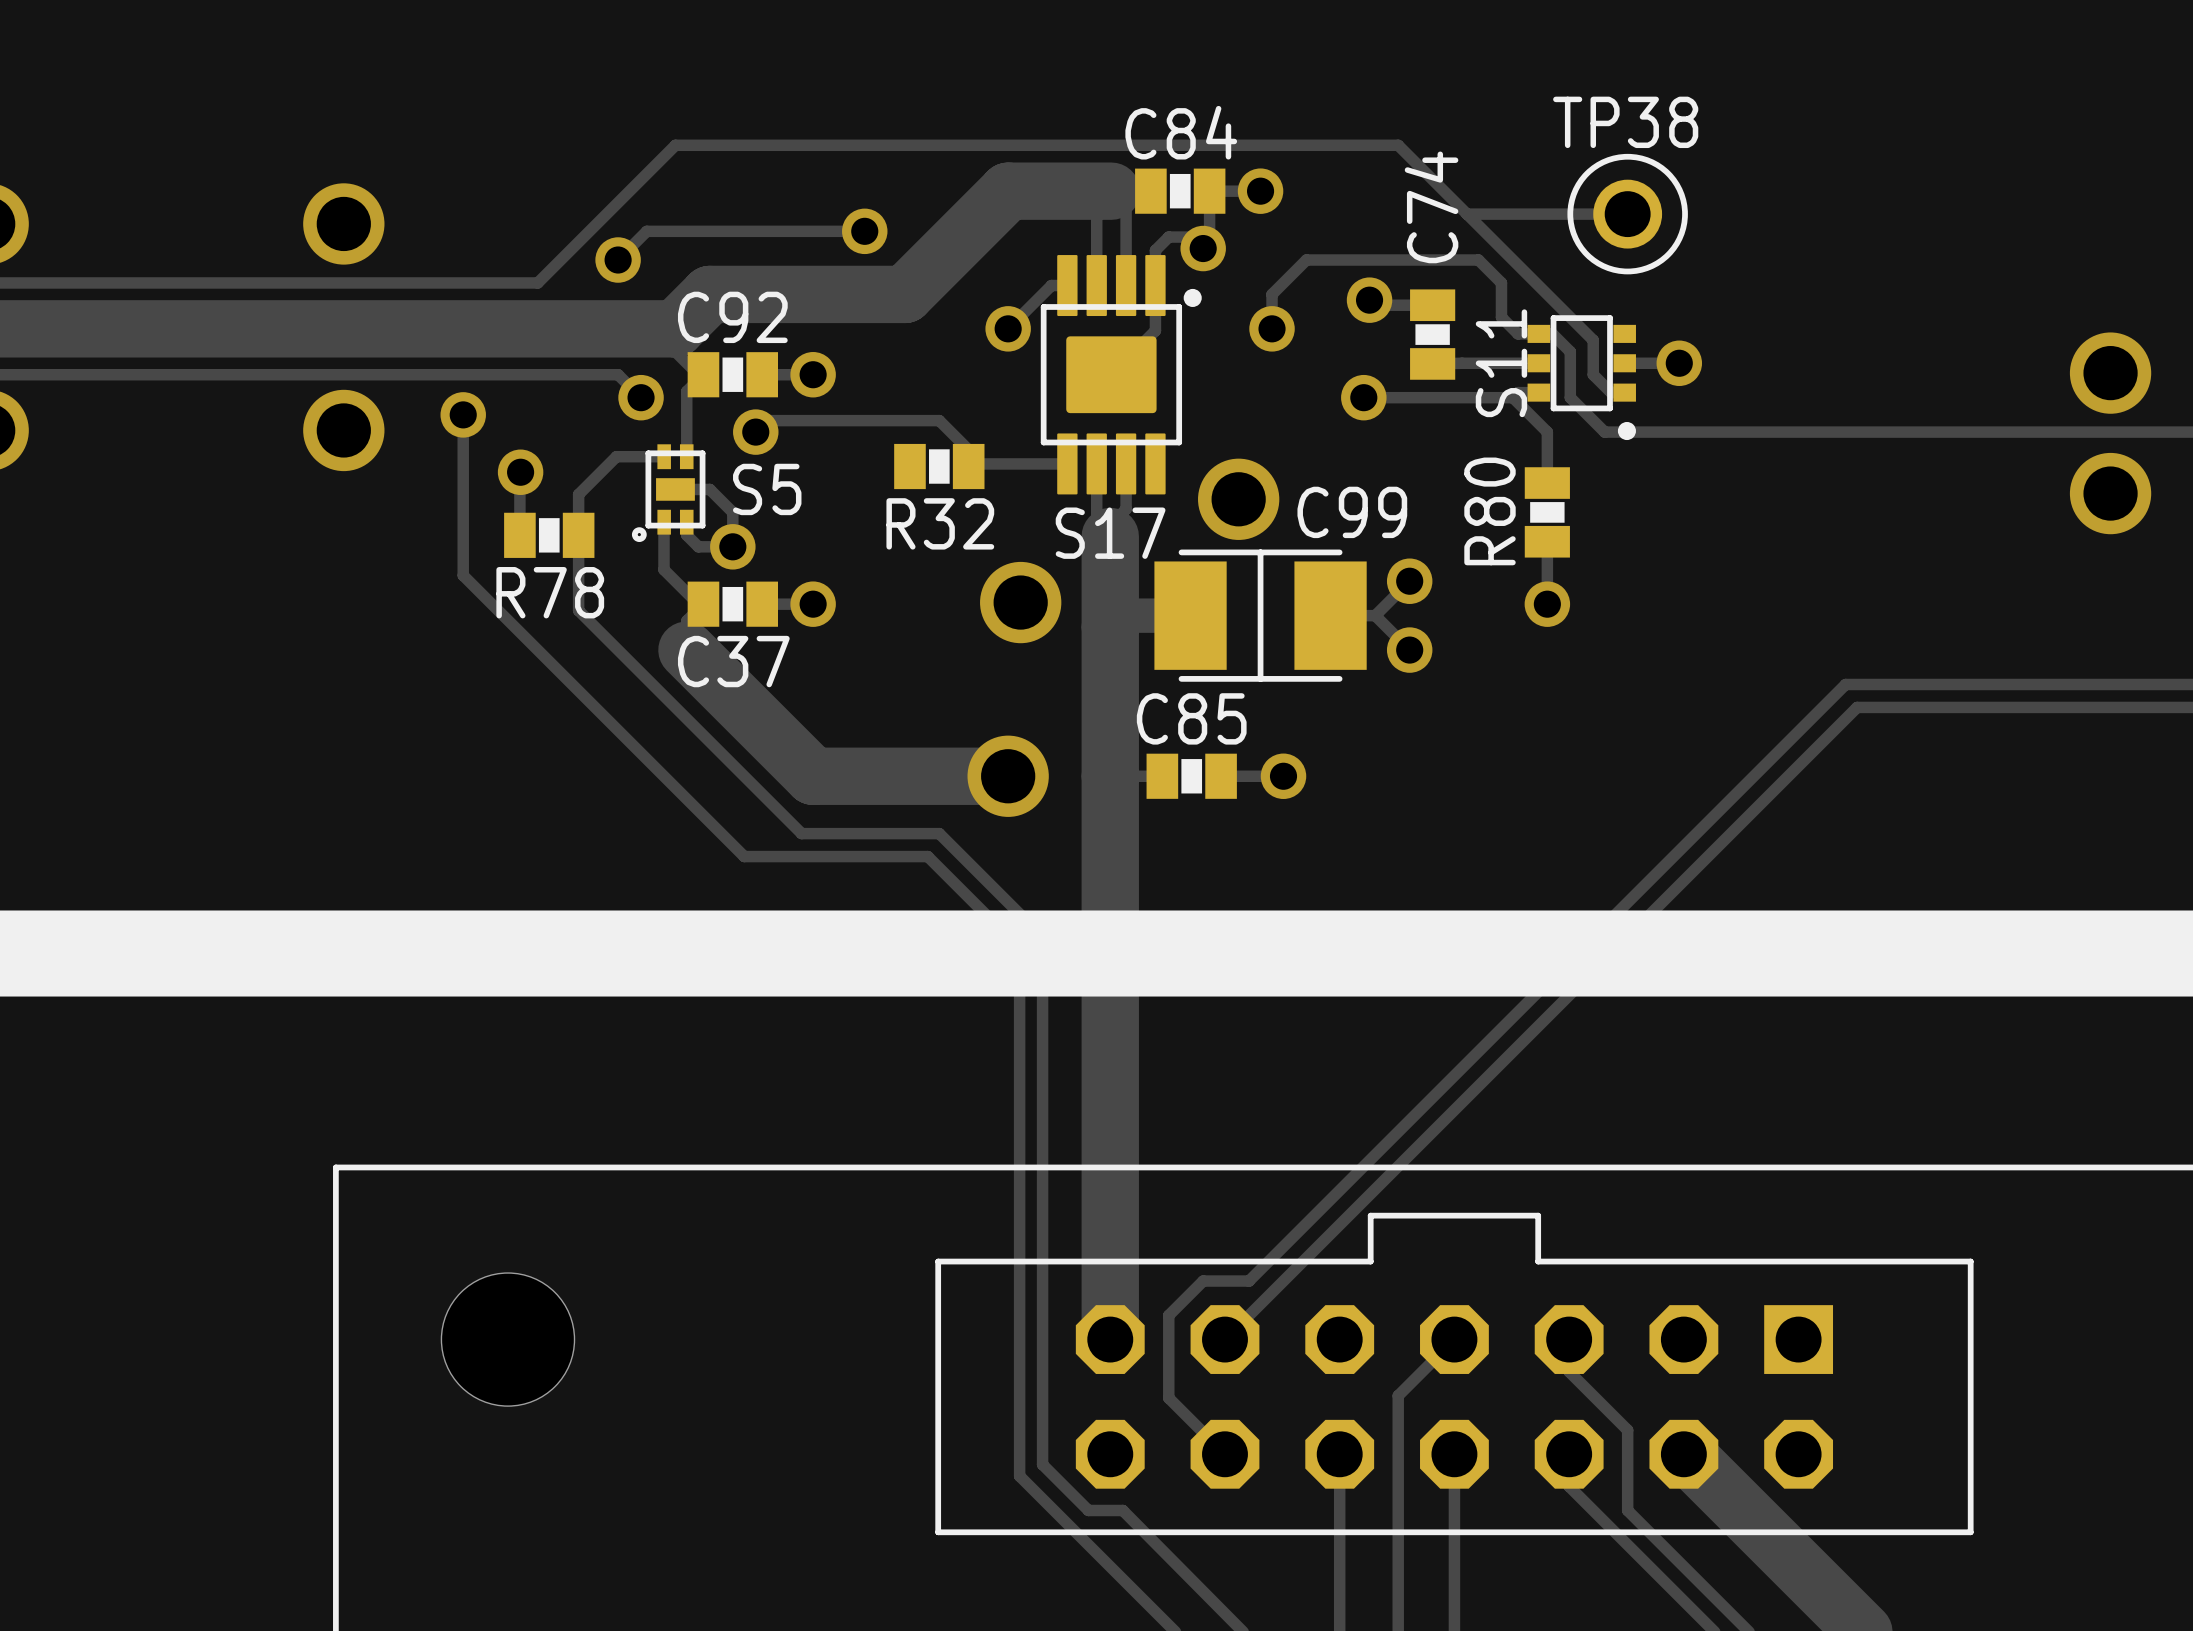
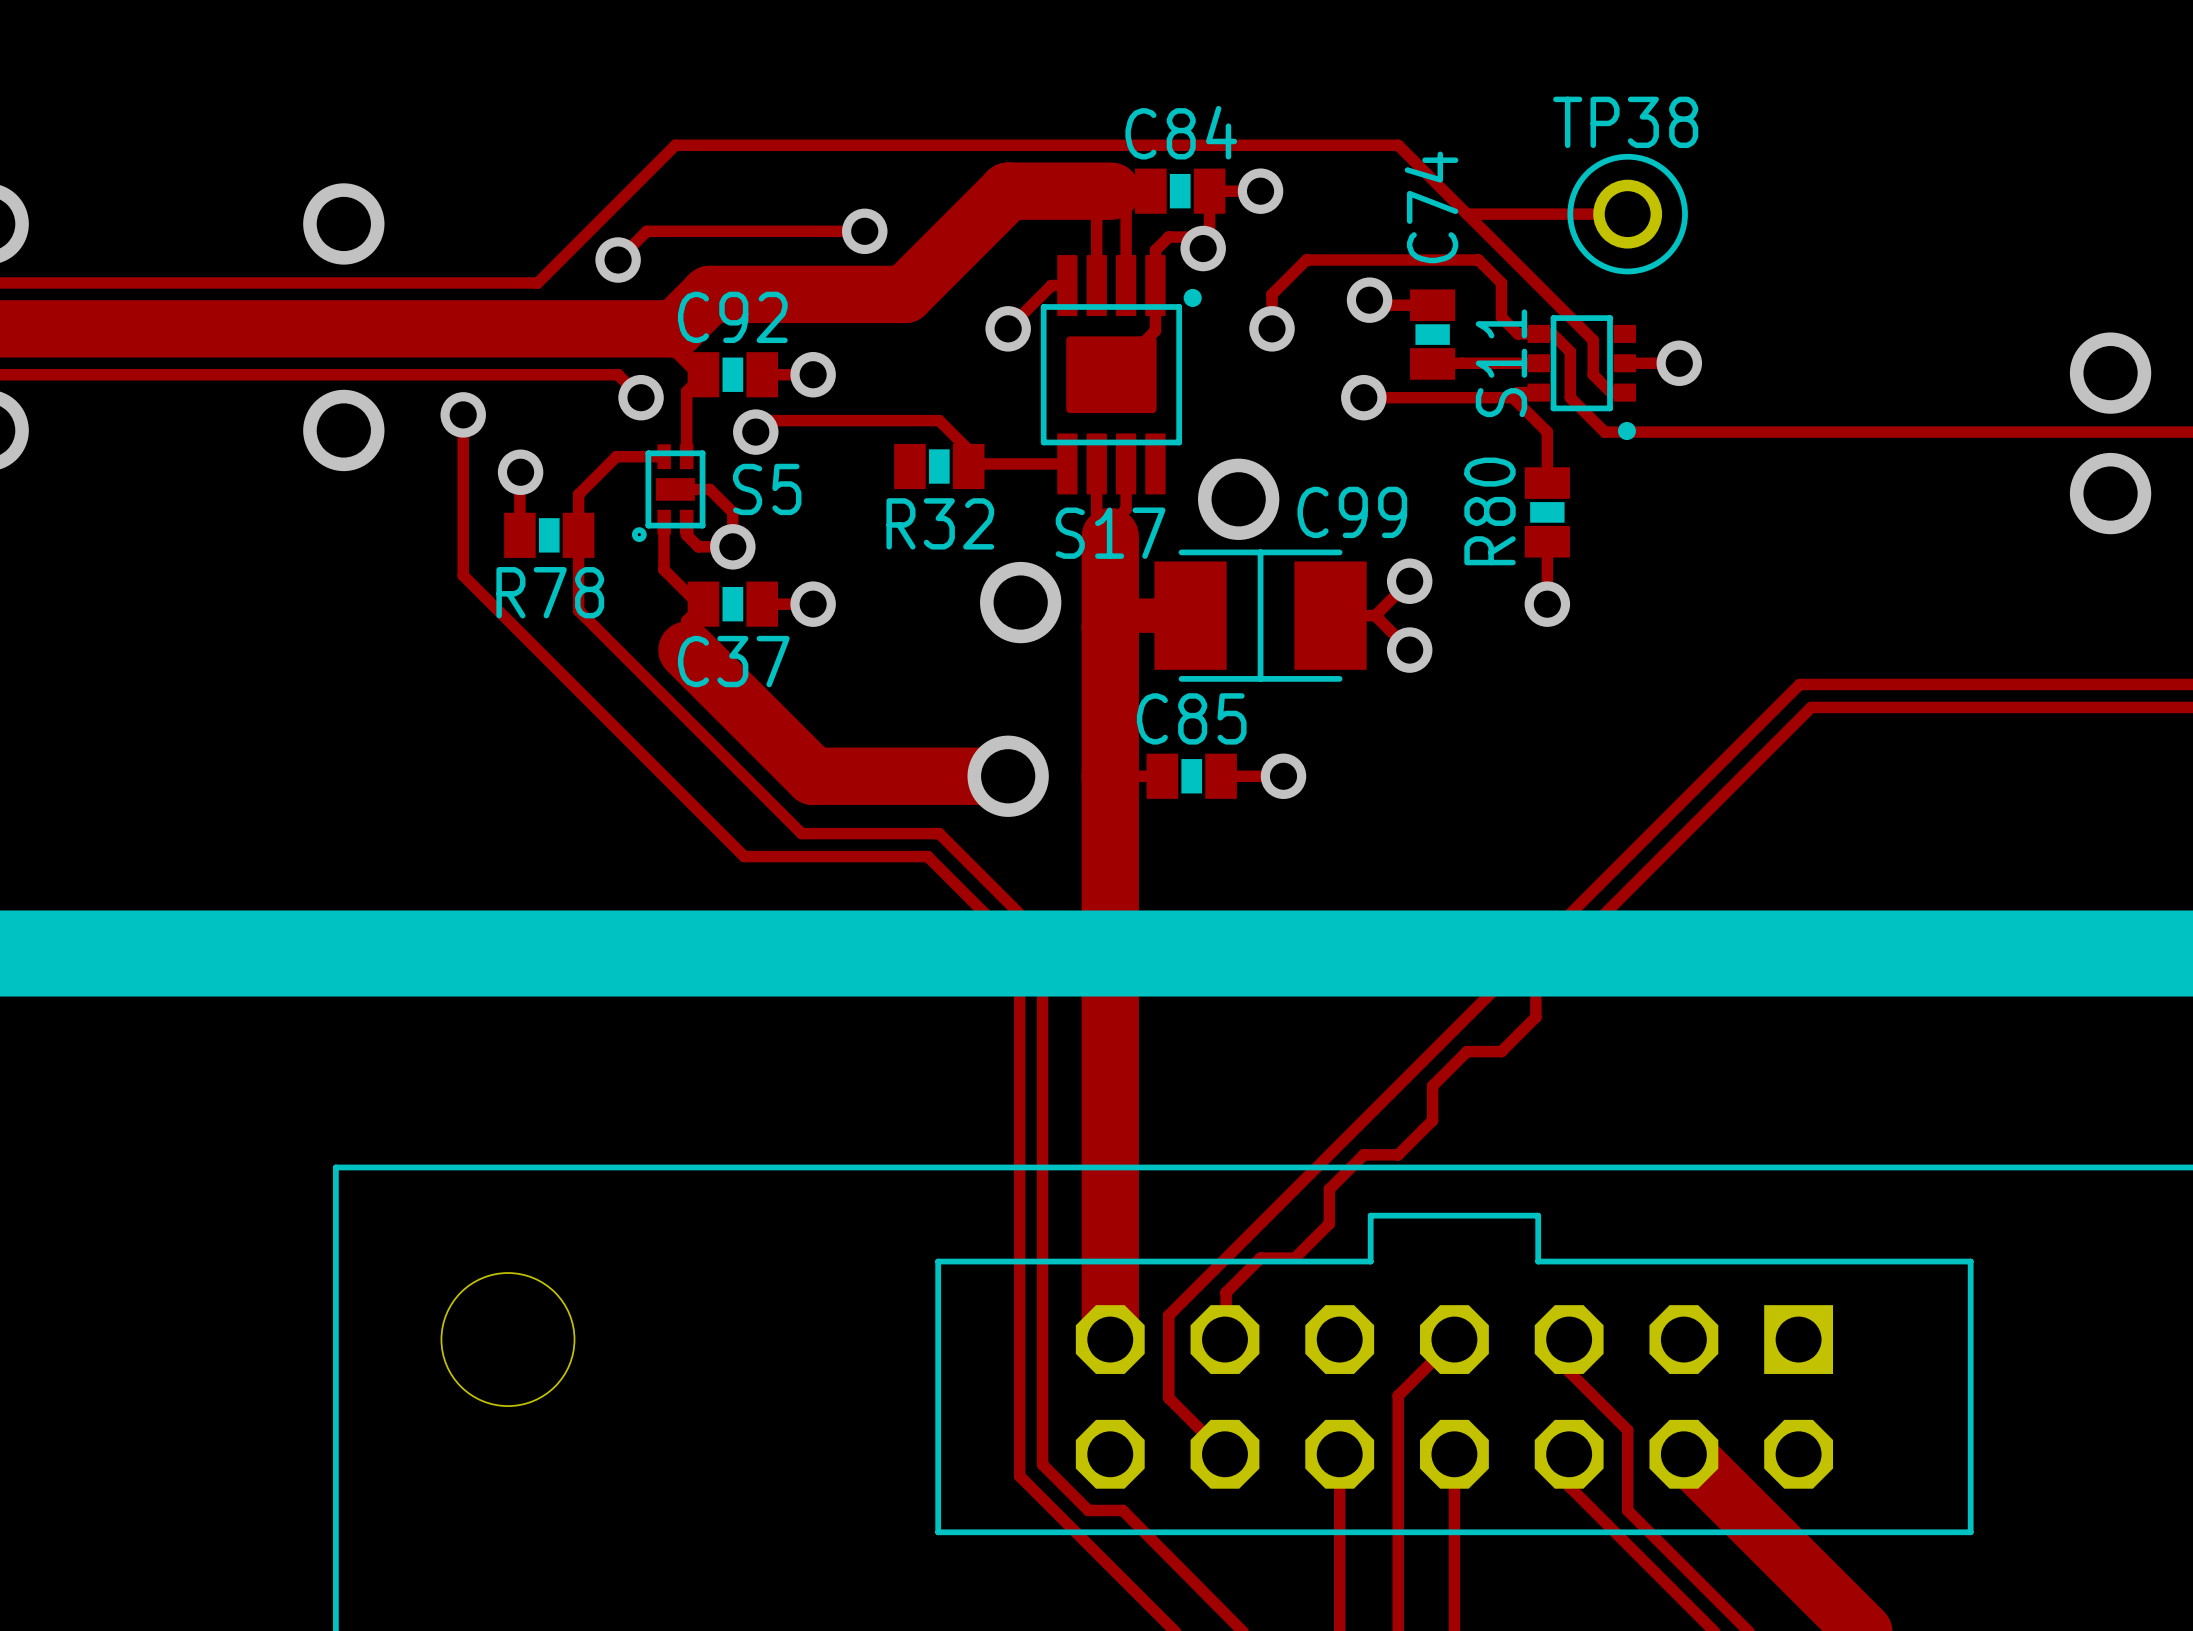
track: (1845, 684) (1249, 1281) (1203, 1281) -> (1845, 684) (1799, 684) (1203, 1281)
track: (1857, 707) (1224, 1339) -> (1857, 707) (1811, 707) (1535, 982) (1535, 1017) (1501, 1051) (1467, 1051) (1432, 1086) (1432, 1120) (1398, 1154) (1363, 1154) (1329, 1189) (1329, 1223) (1294, 1258) (1260, 1258) (1226, 1292) (1224, 1339)

